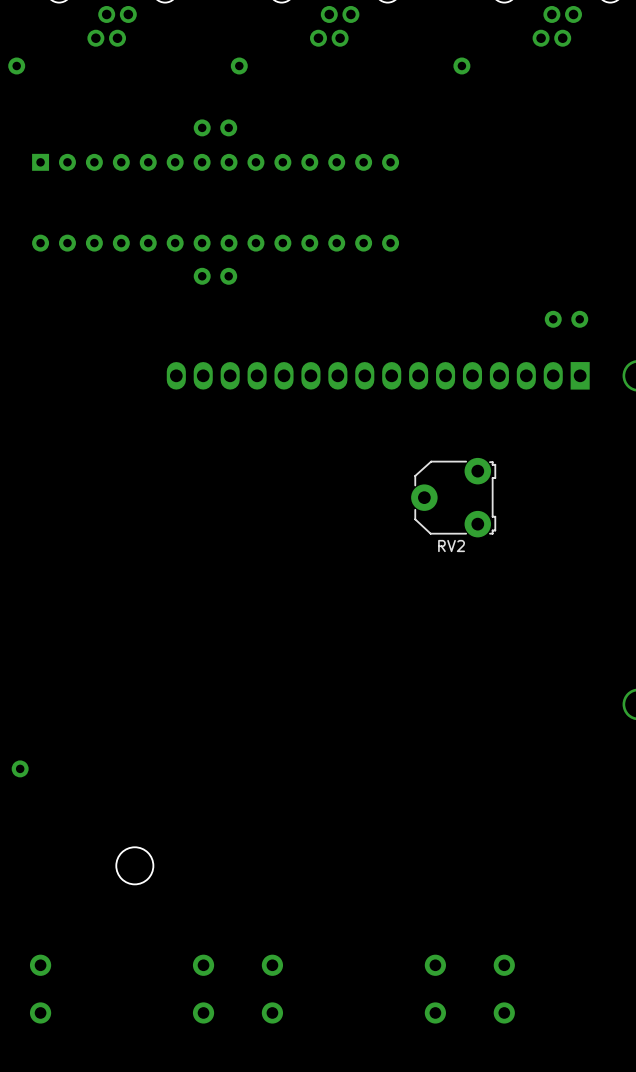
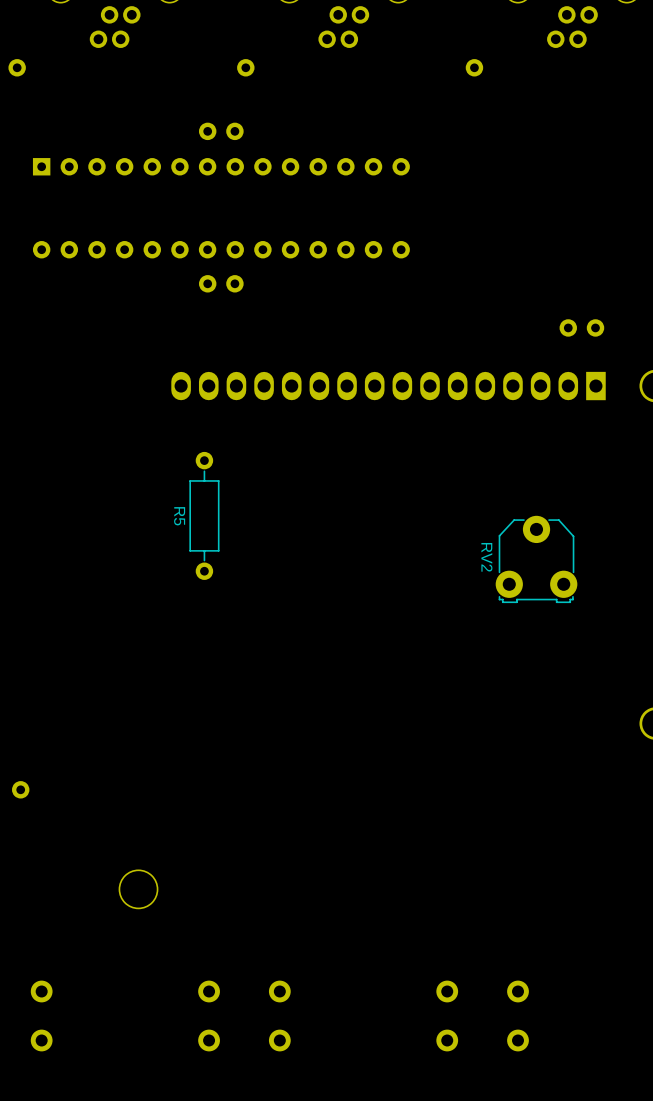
RV2 rotation: 0° (453, 497) -> 90° clockwise (536, 559)
RV2 position: (453, 497) -> (536, 559)
R5: none -> (204, 515)

